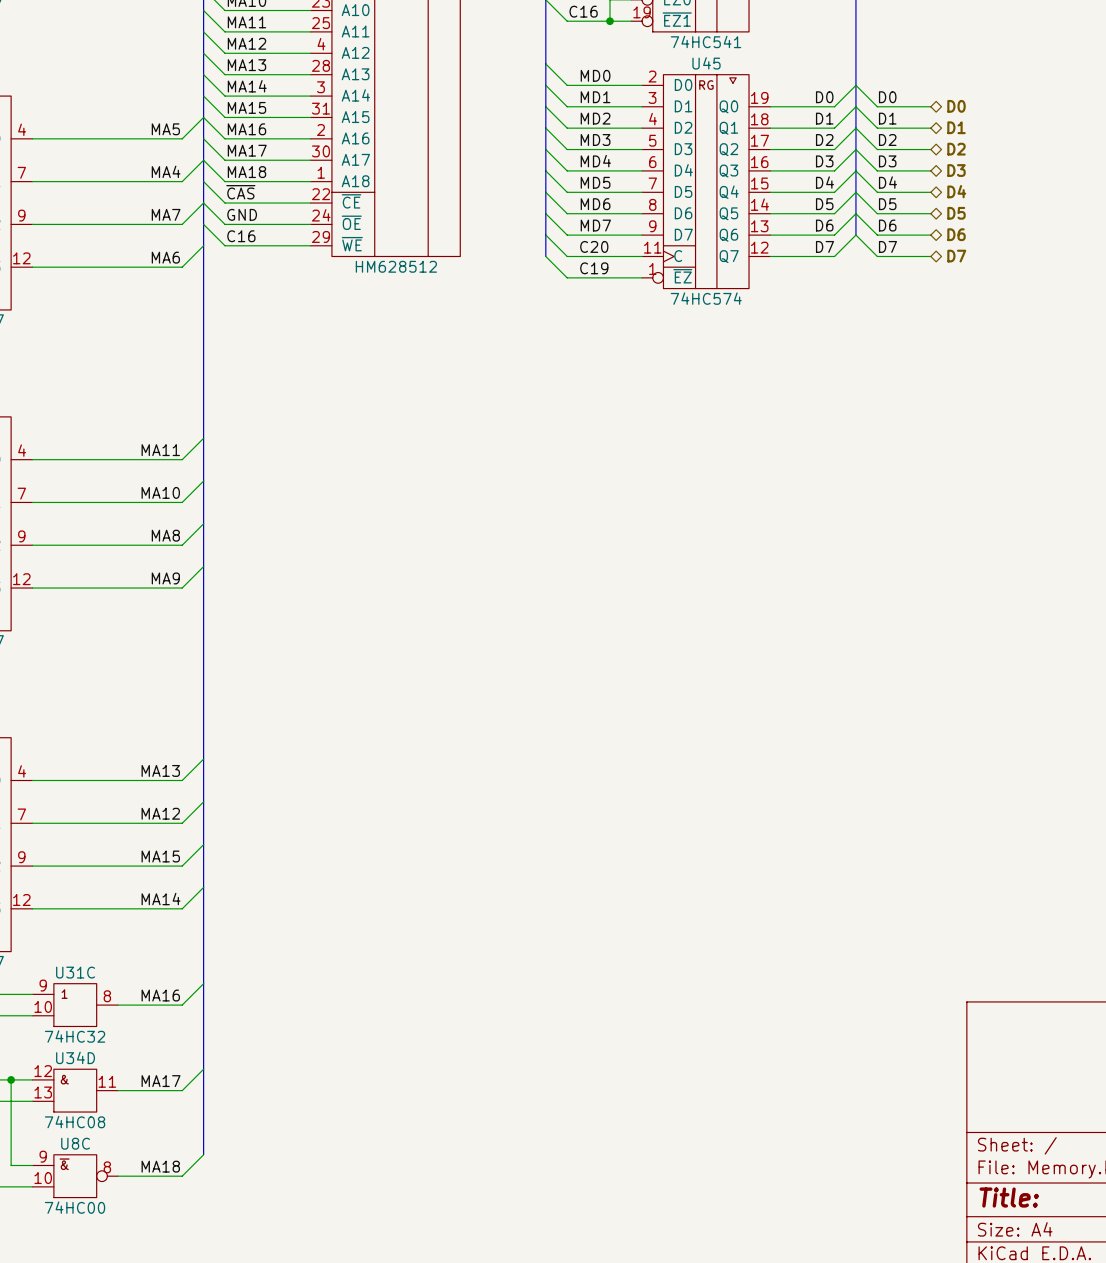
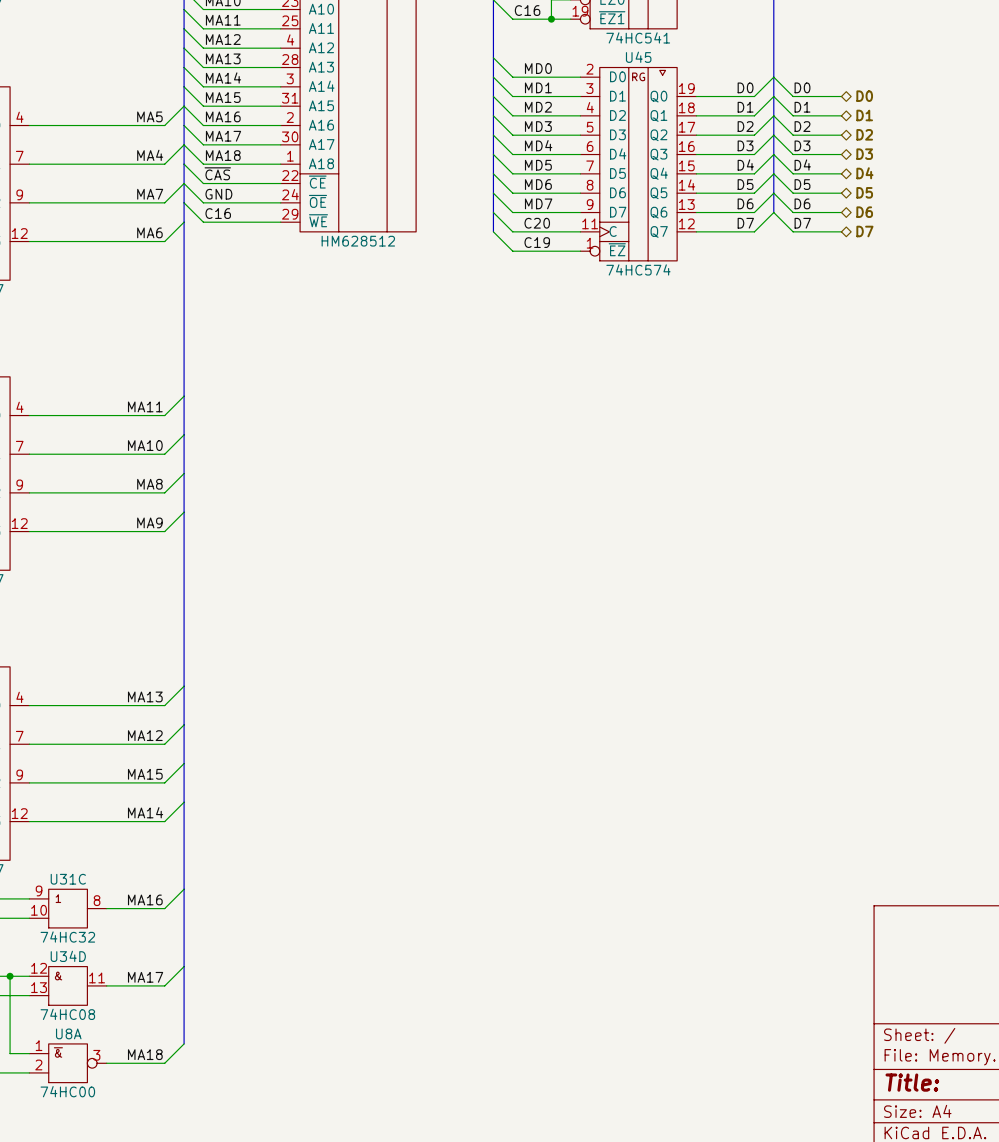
U8C name: U8C (75, 1143) -> U8A (68, 1033)
U8C pin number: 9 (43, 1156) -> 1 (39, 1045)
U8C pin number: 8 (107, 1167) -> 3 (96, 1055)
U8C pin number: 10 (43, 1178) -> 2 (38, 1064)

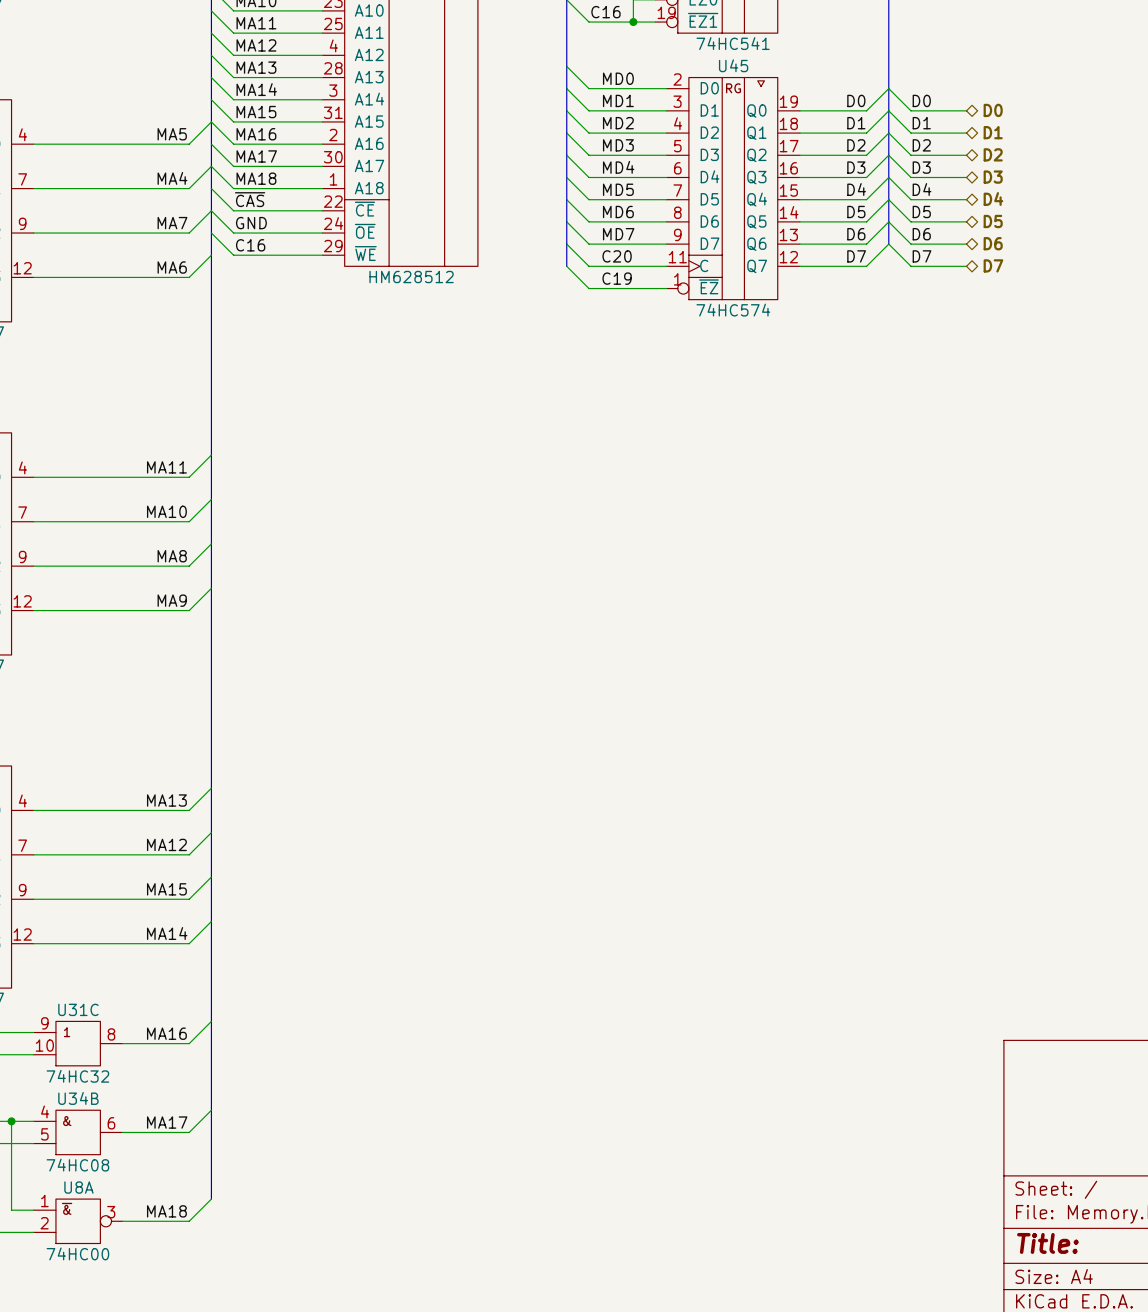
U34D name: U34D (68, 956) -> U34B (78, 1098)
U34D pin number: 12 (39, 968) -> 4 (45, 1111)
U34D pin number: 11 (97, 977) -> 6 (111, 1123)
U34D pin number: 13 (39, 987) -> 5 (44, 1134)

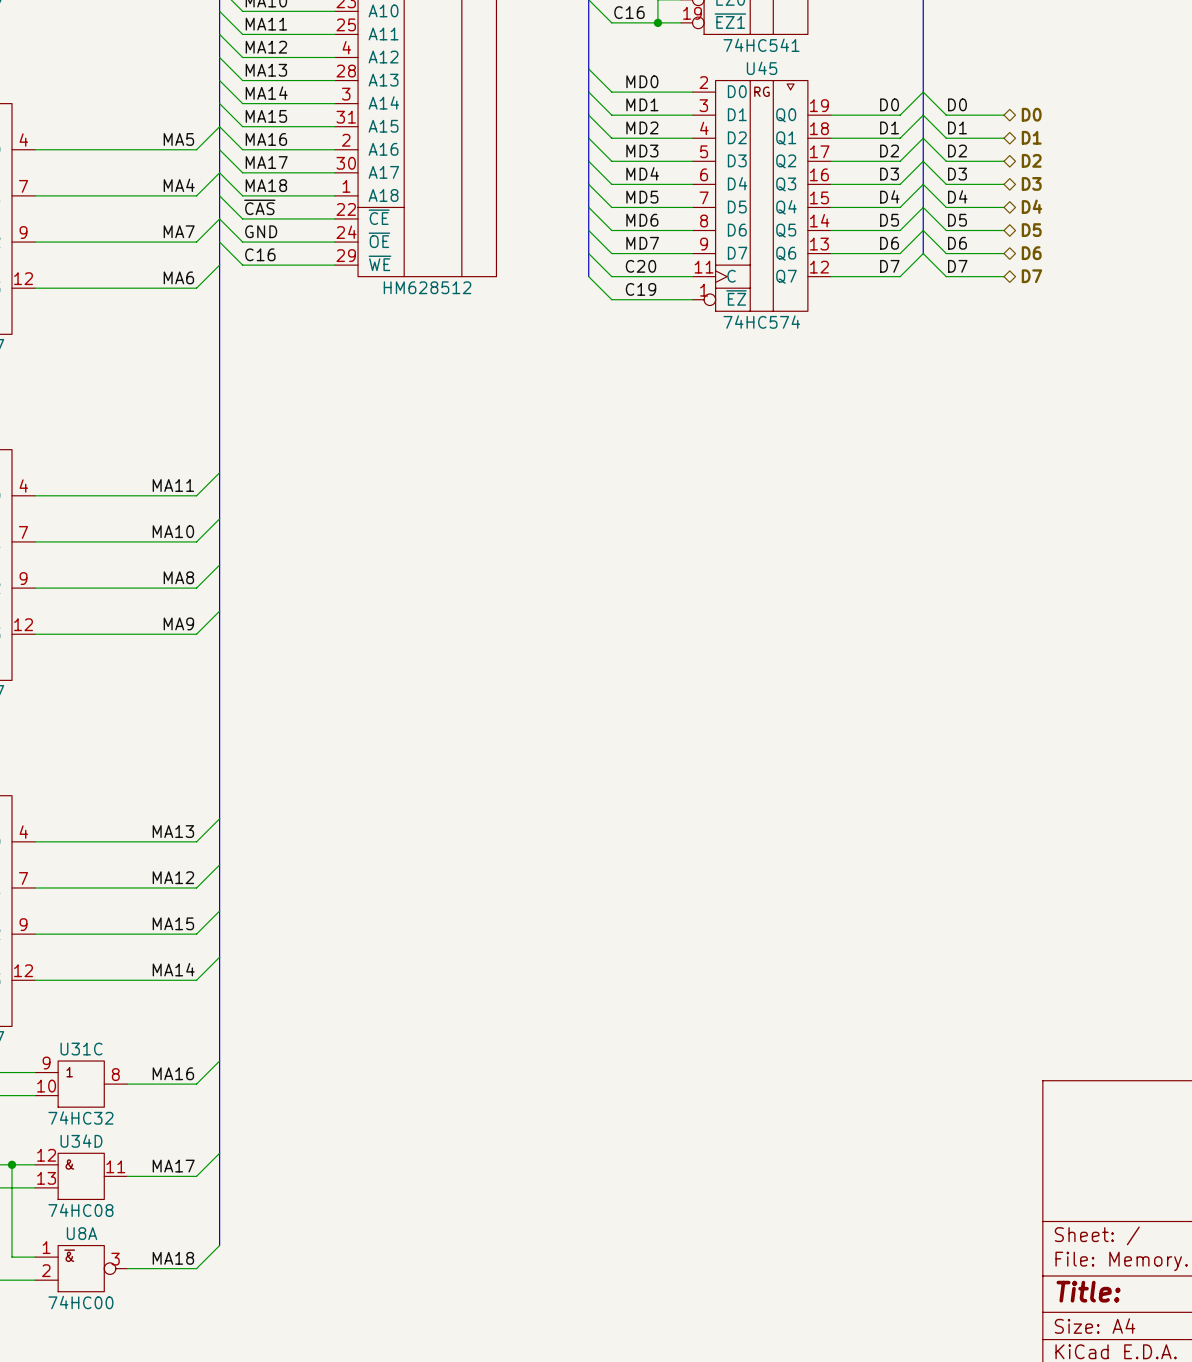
U34B name: U34B (78, 1098) -> U34D (81, 1141)
U34B pin number: 4 (45, 1111) -> 12 (46, 1155)
U34B pin number: 6 (111, 1123) -> 11 (115, 1166)
U34B pin number: 5 (44, 1134) -> 13 (46, 1178)

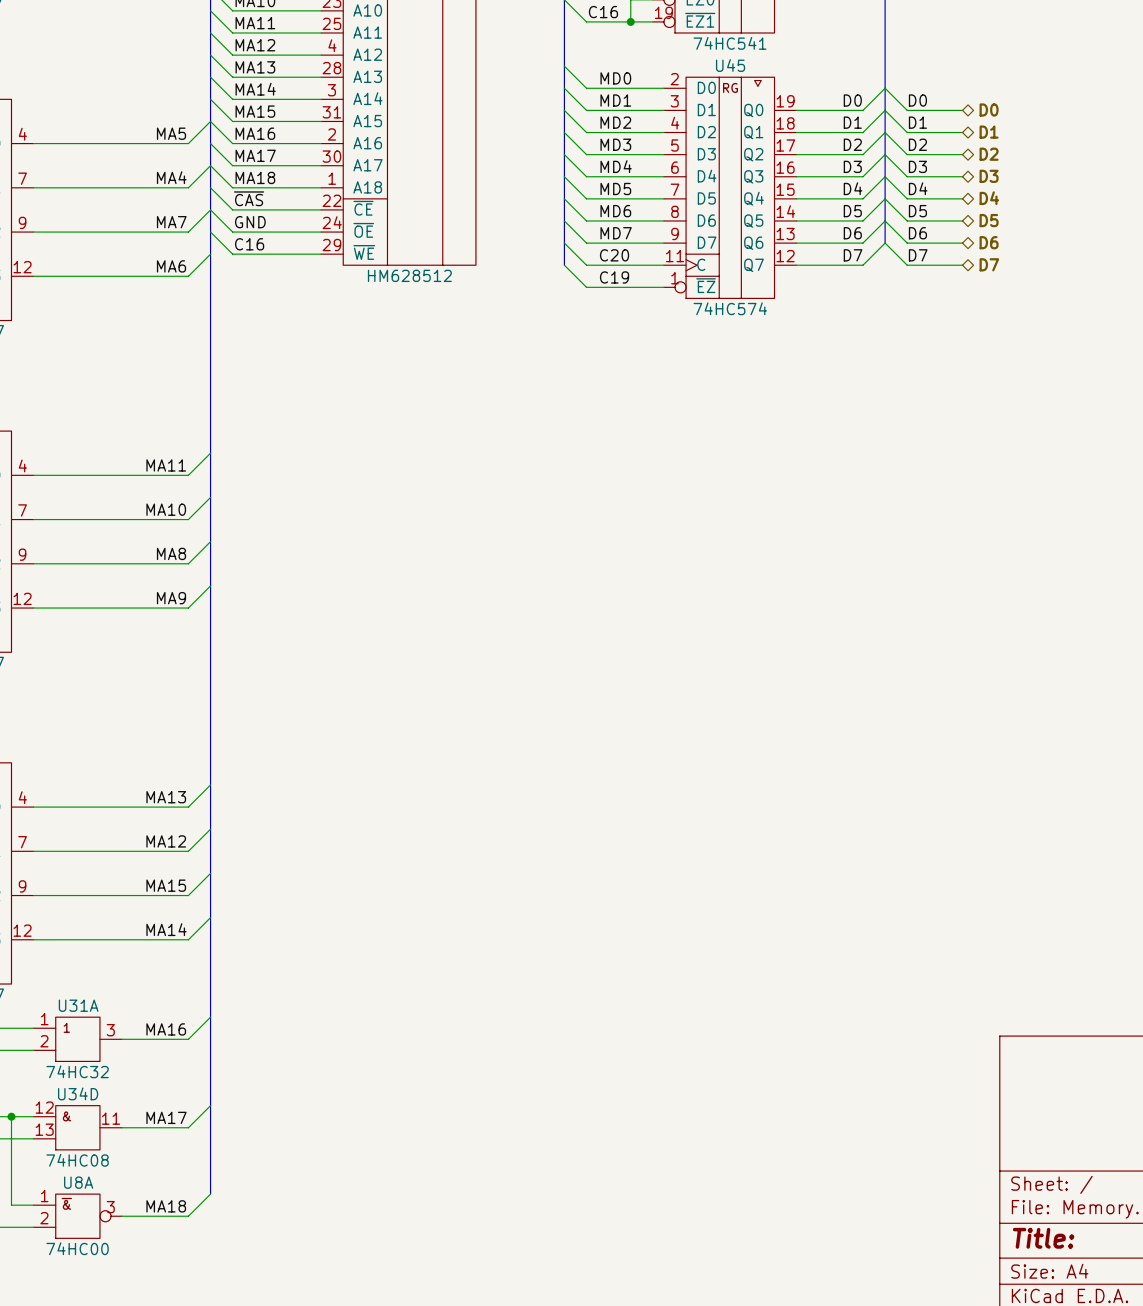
U31C name: U31C (81, 1049) -> U31A (78, 1005)
U31C pin number: 9 (46, 1063) -> 1 (44, 1019)
U31C pin number: 8 (115, 1074) -> 3 (110, 1030)
U31C pin number: 10 (46, 1086) -> 2 (44, 1041)

